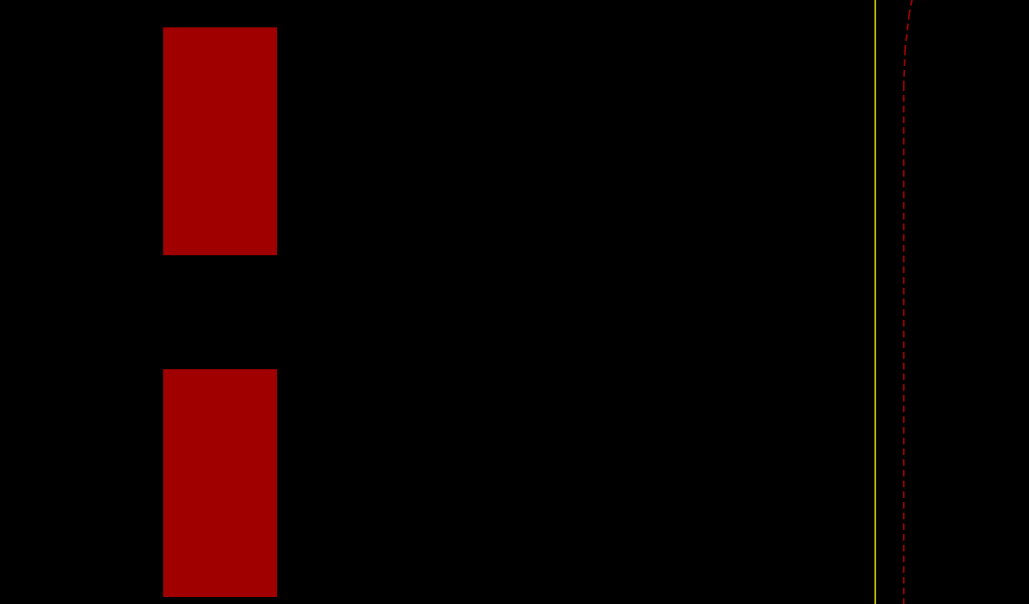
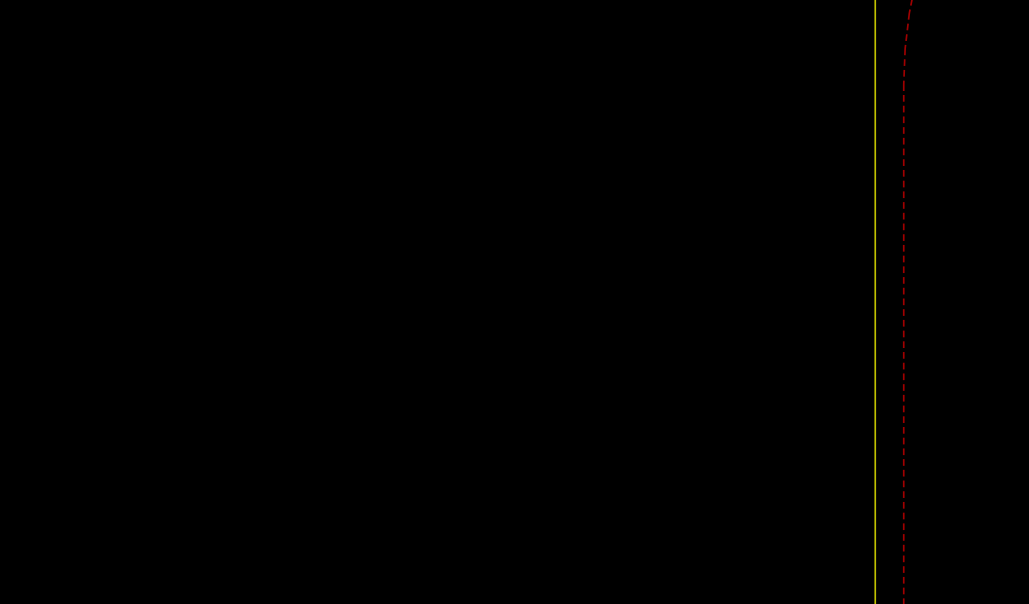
part: (220, 141) -> none
part: (220, 483) -> none

